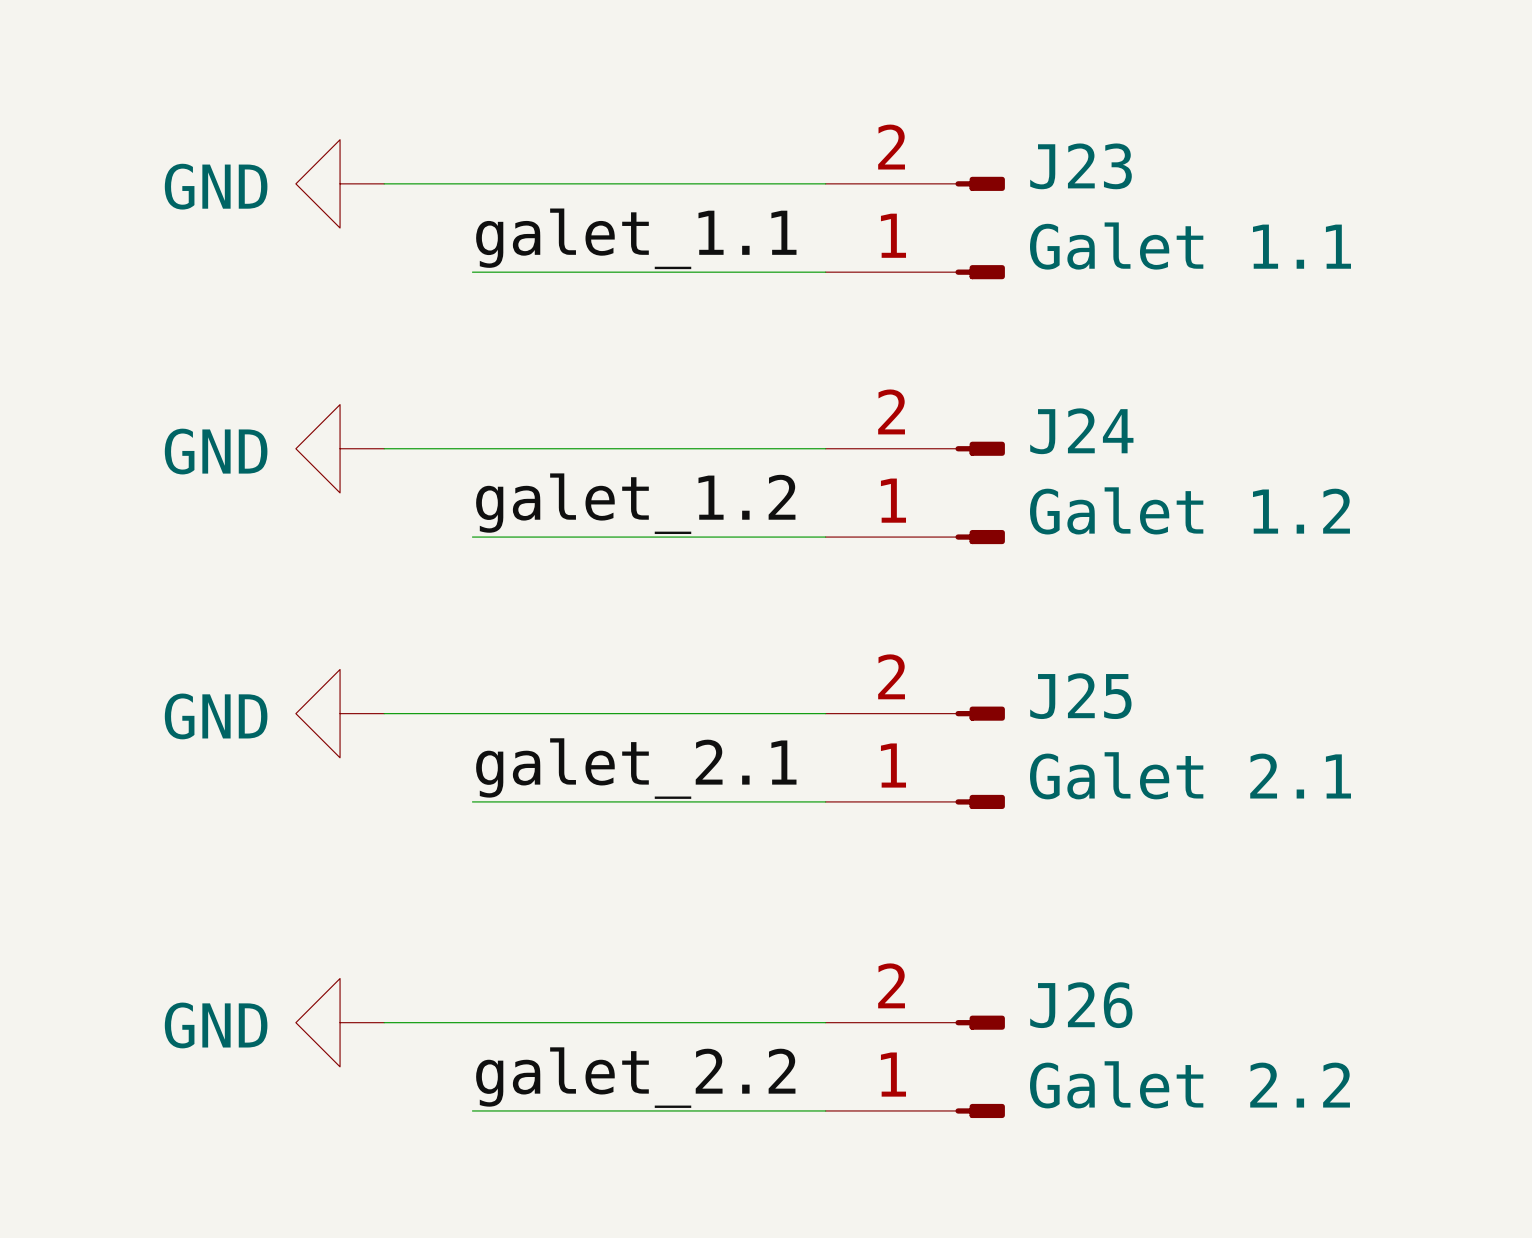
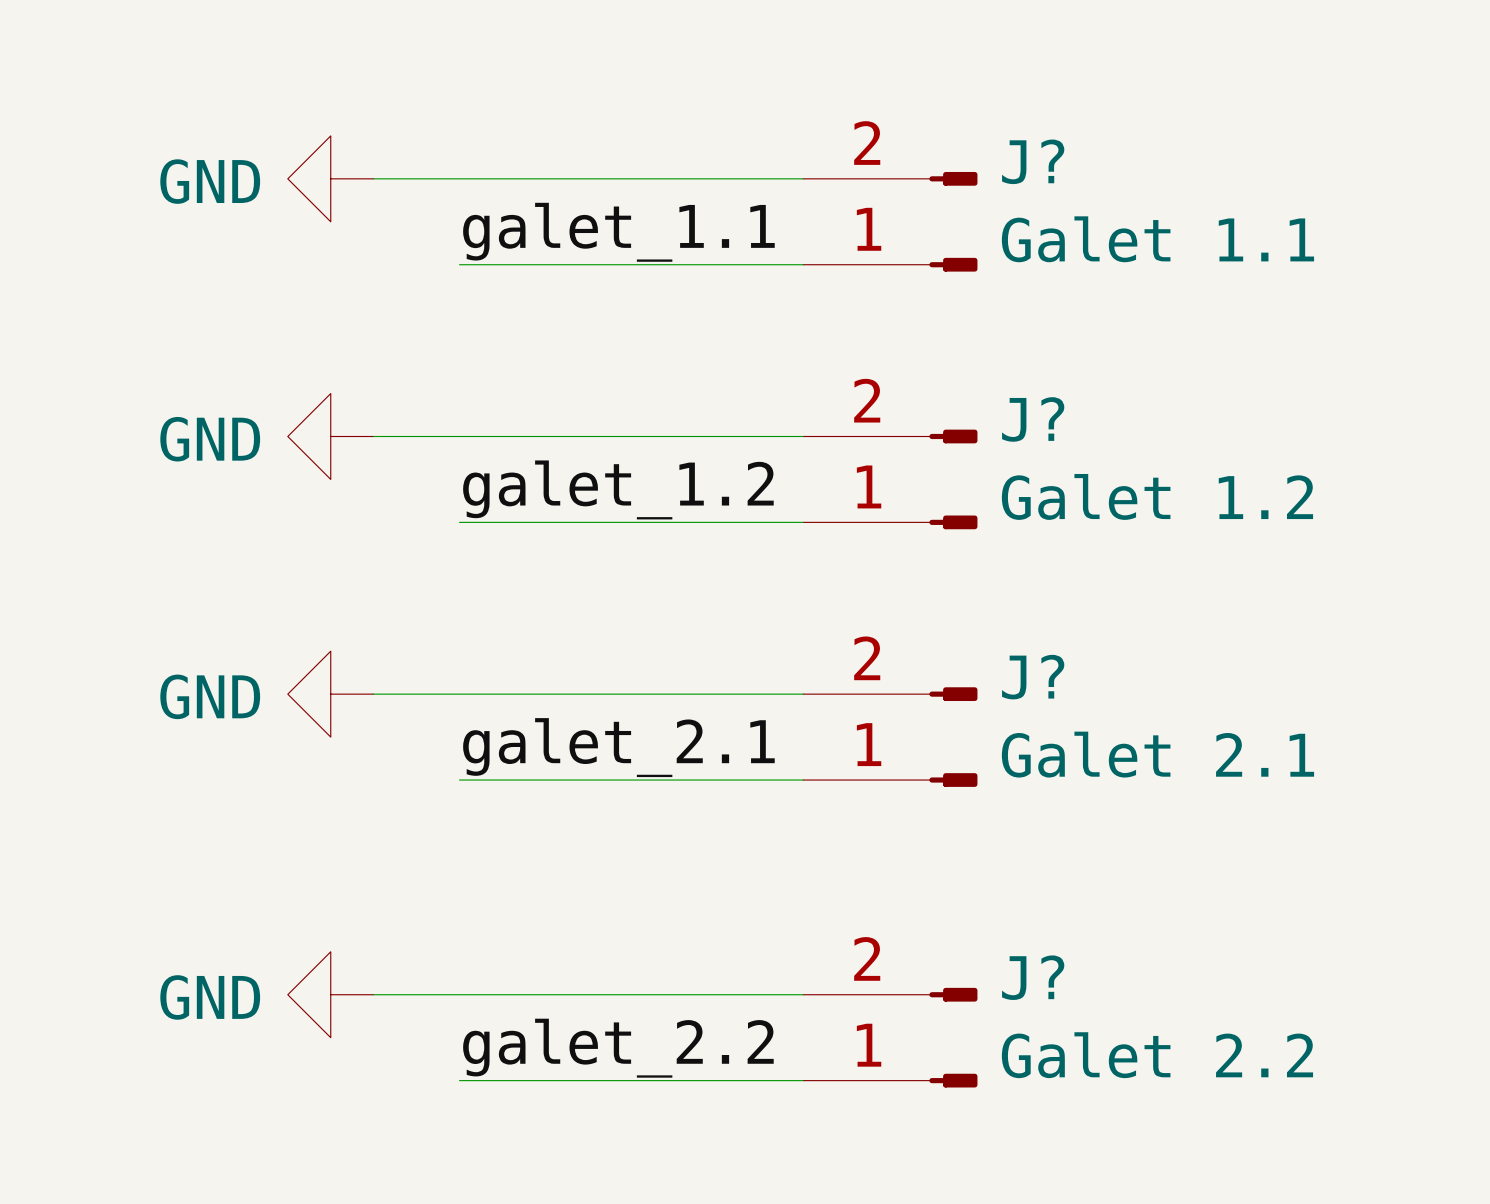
J23 name: J23 (1081, 166) -> J? (1033, 161)
J24 name: J24 (1081, 431) -> J? (1033, 419)
J25 name: J25 (1080, 696) -> J? (1033, 677)
J26 name: J26 (1081, 1005) -> J? (1033, 977)

